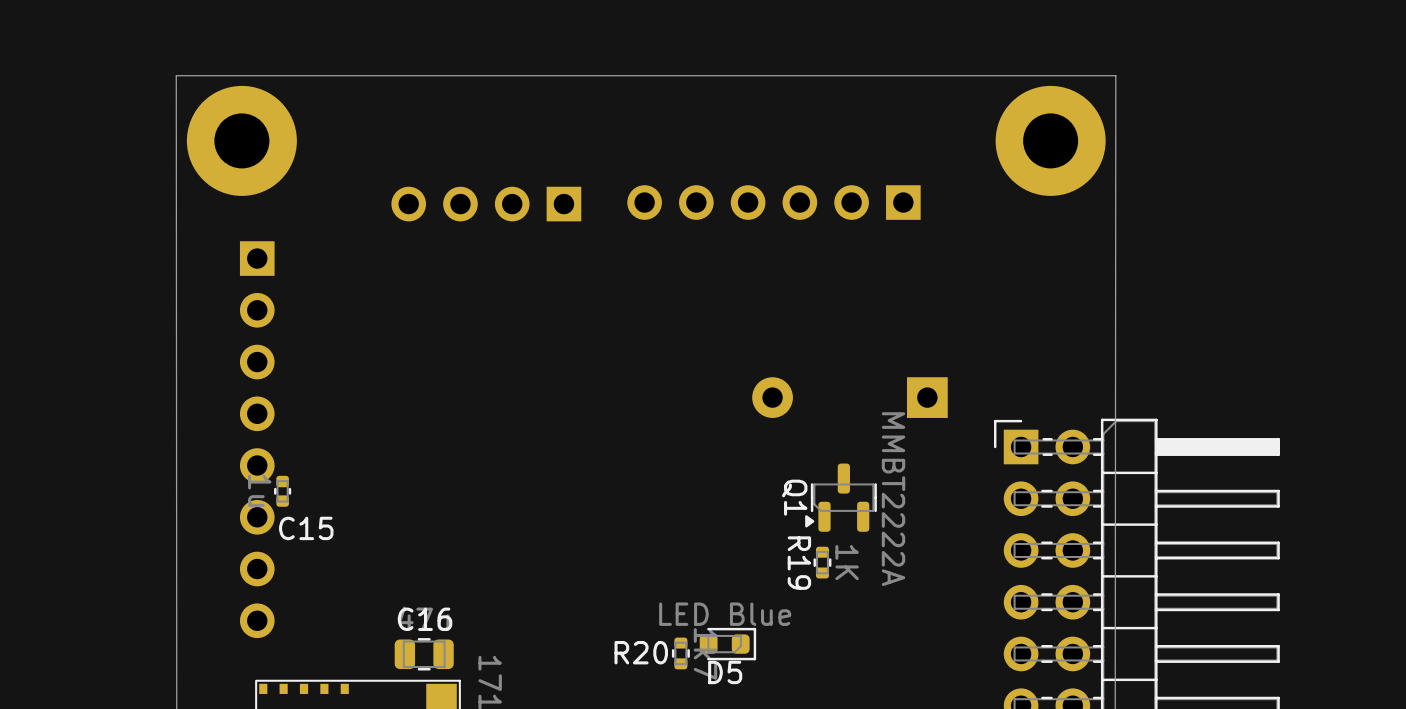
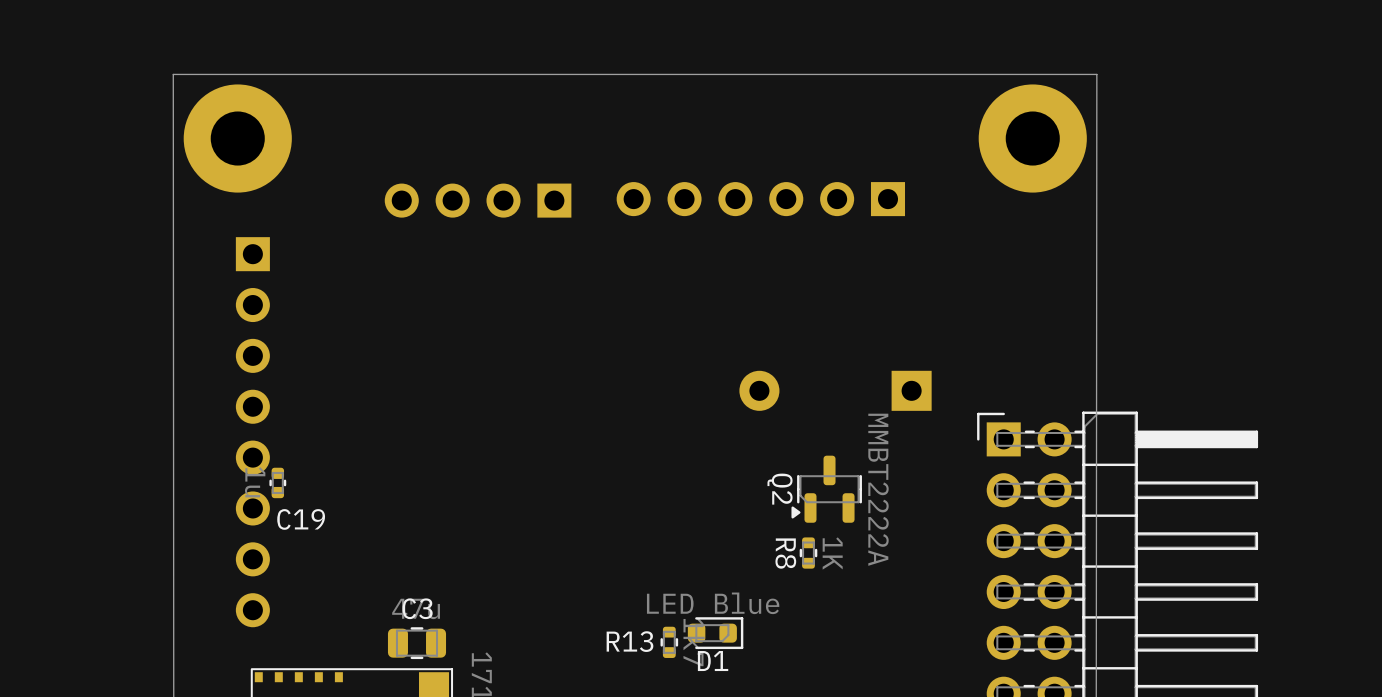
Q1 name: Q1 (794, 497) -> Q2 (780, 489)
C15 name: C15 (306, 528) -> C19 (301, 519)
R19 name: R19 (799, 563) -> R8 (785, 553)
C16 name: C16 (425, 619) -> C3 (417, 608)
R20 name: R20 (641, 652) -> R13 (629, 641)
D5 name: D5 (725, 672) -> D1 (713, 661)

